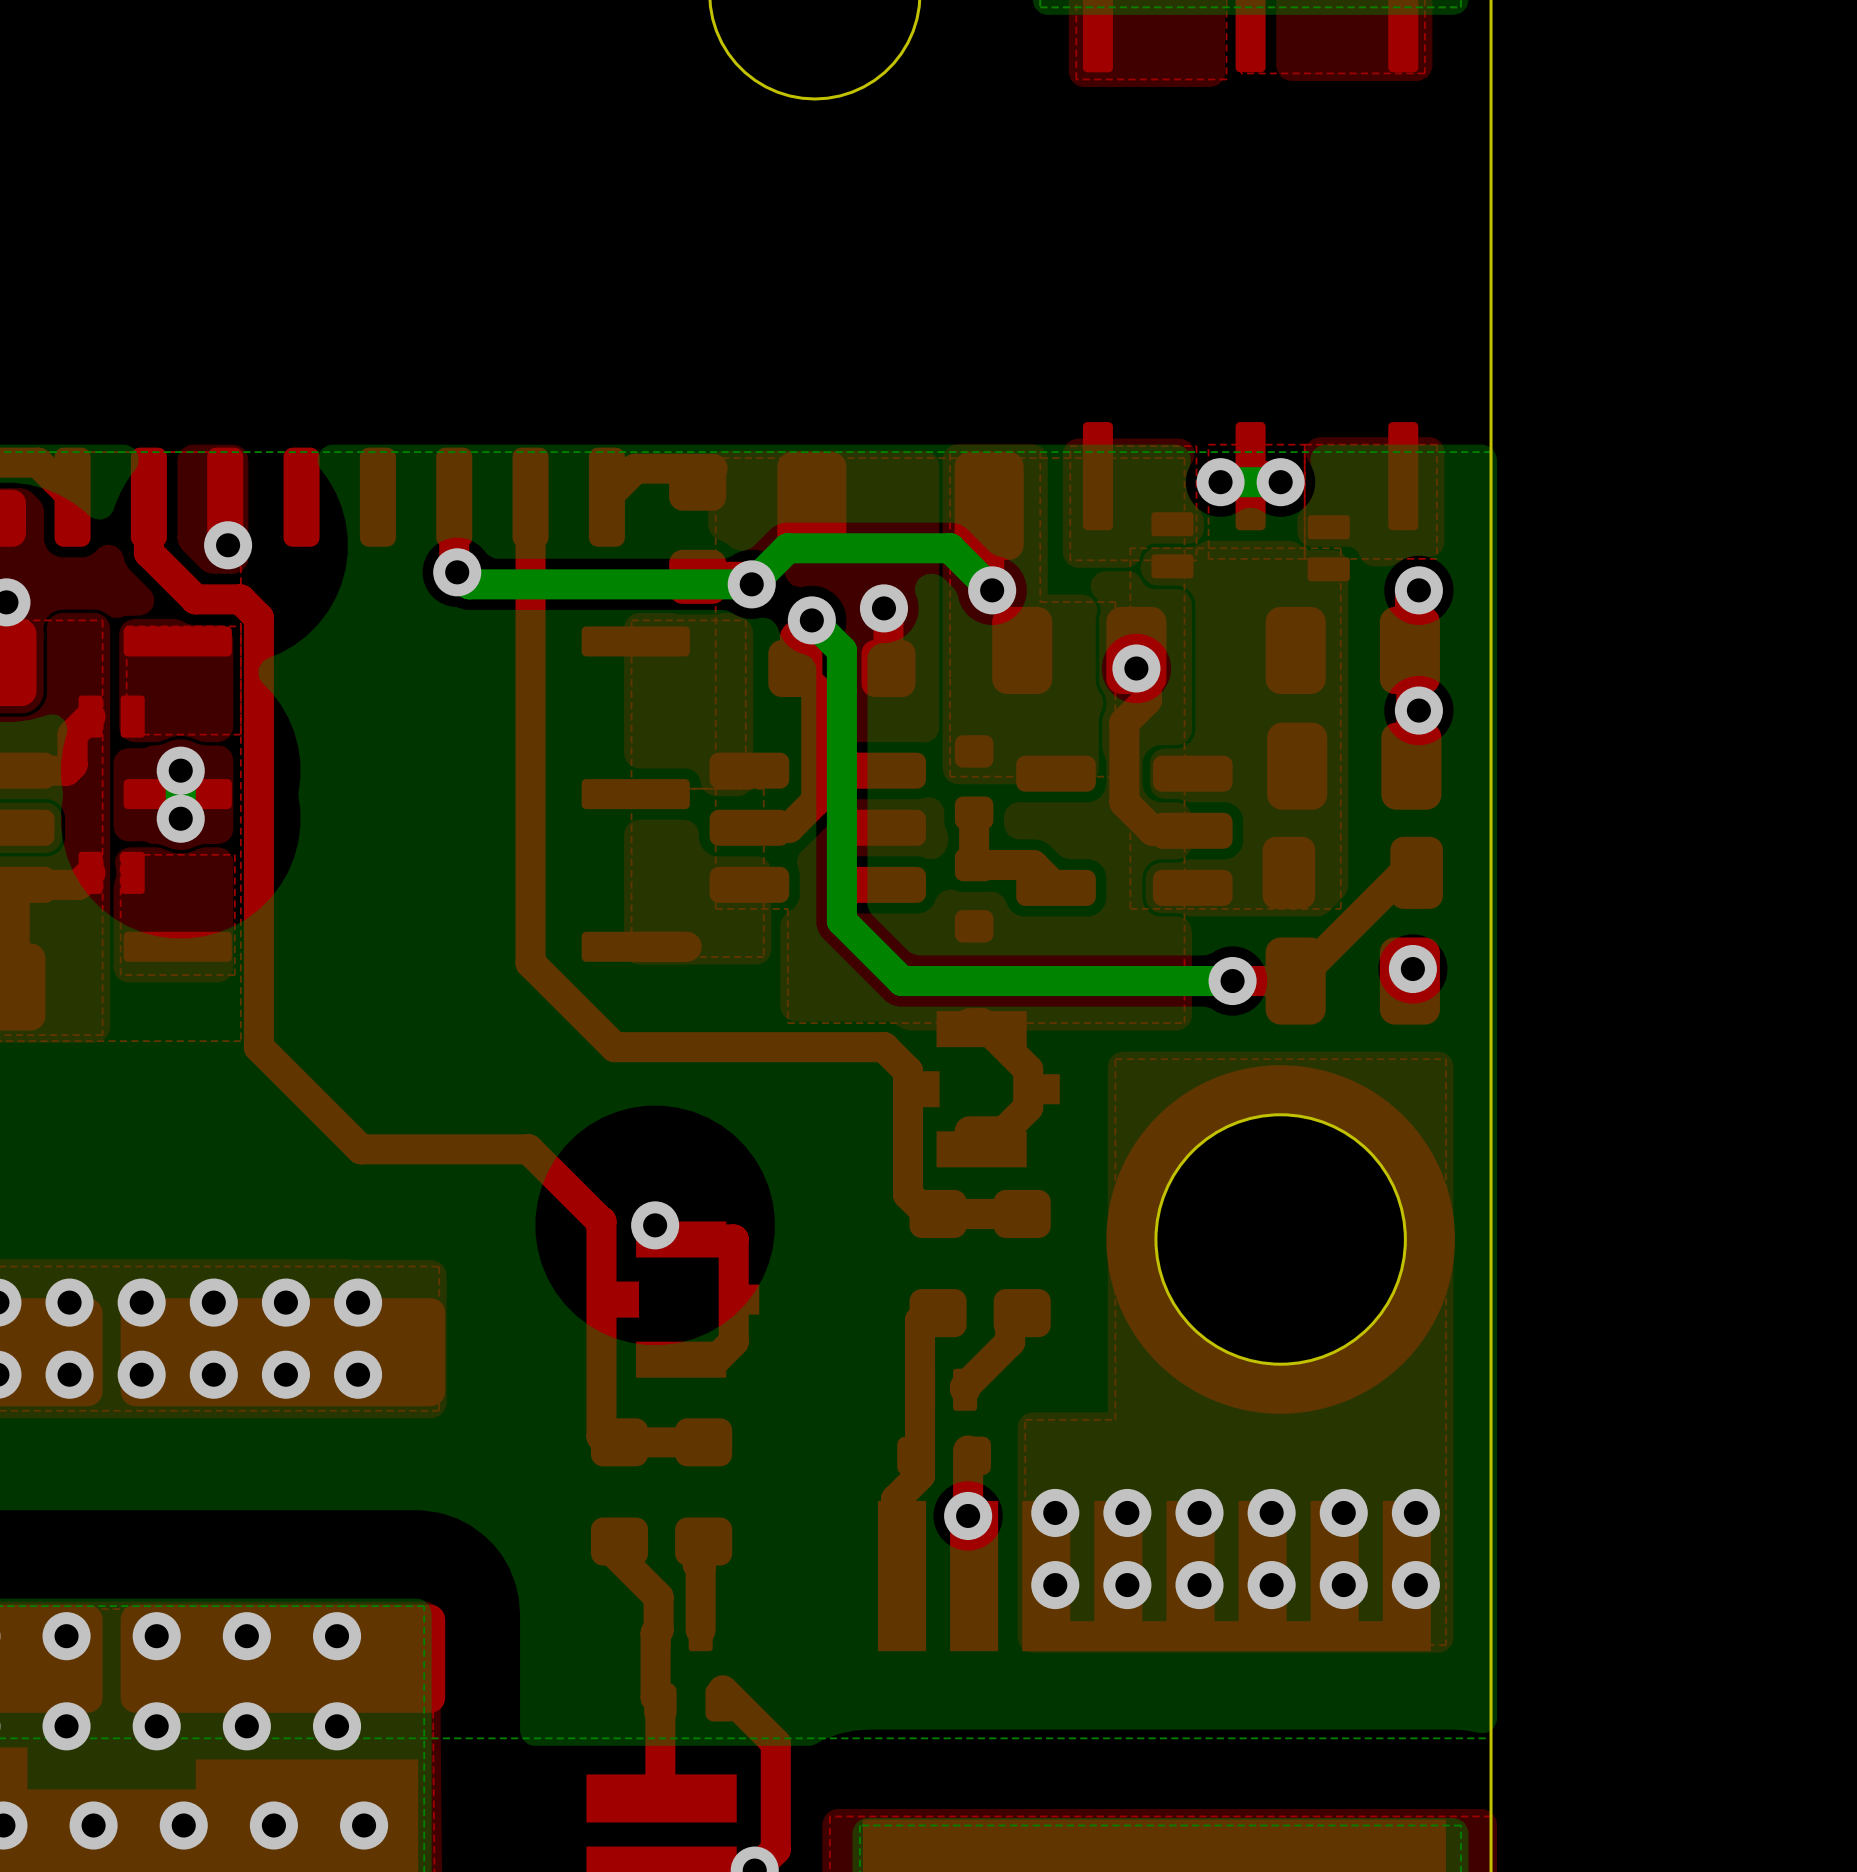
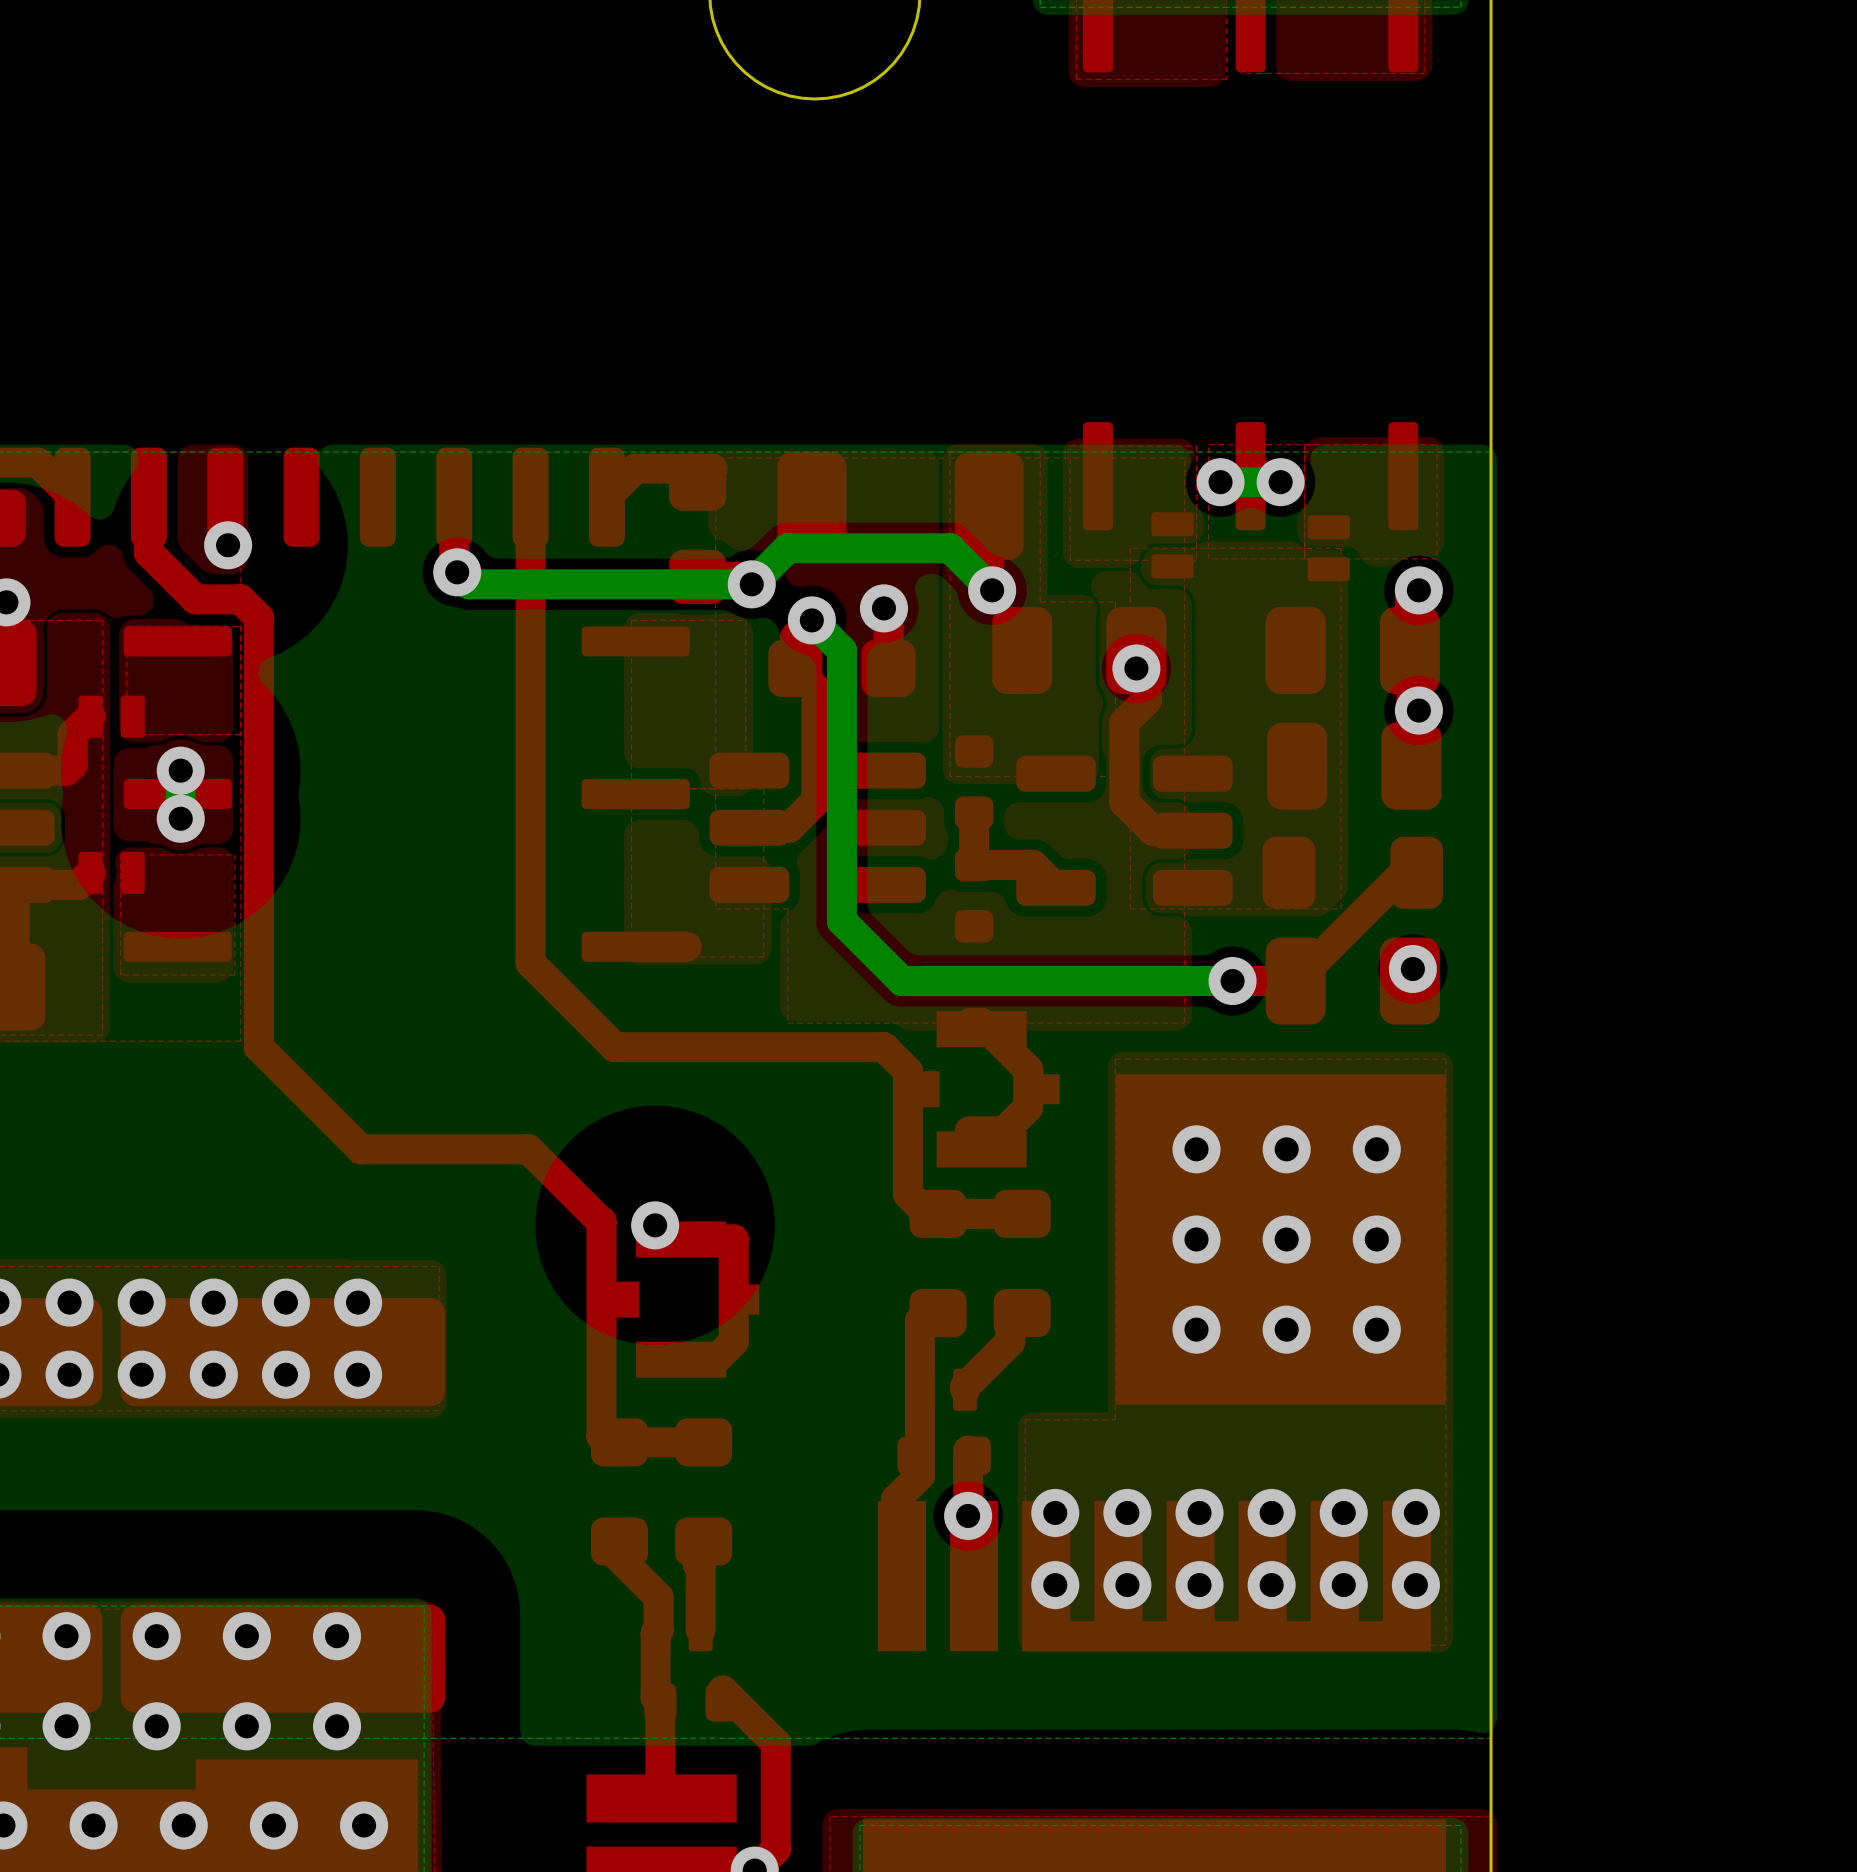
part footprint: [1106, 1065, 1455, 1414] -> [1115, 1074, 1446, 1405]
via: none -> (1196, 1149)
via: none -> (1286, 1149)
via: none -> (1376, 1149)
via: none -> (1196, 1239)
via: none -> (1286, 1239)
via: none -> (1376, 1239)
via: none -> (1196, 1329)
via: none -> (1286, 1329)
via: none -> (1376, 1329)

